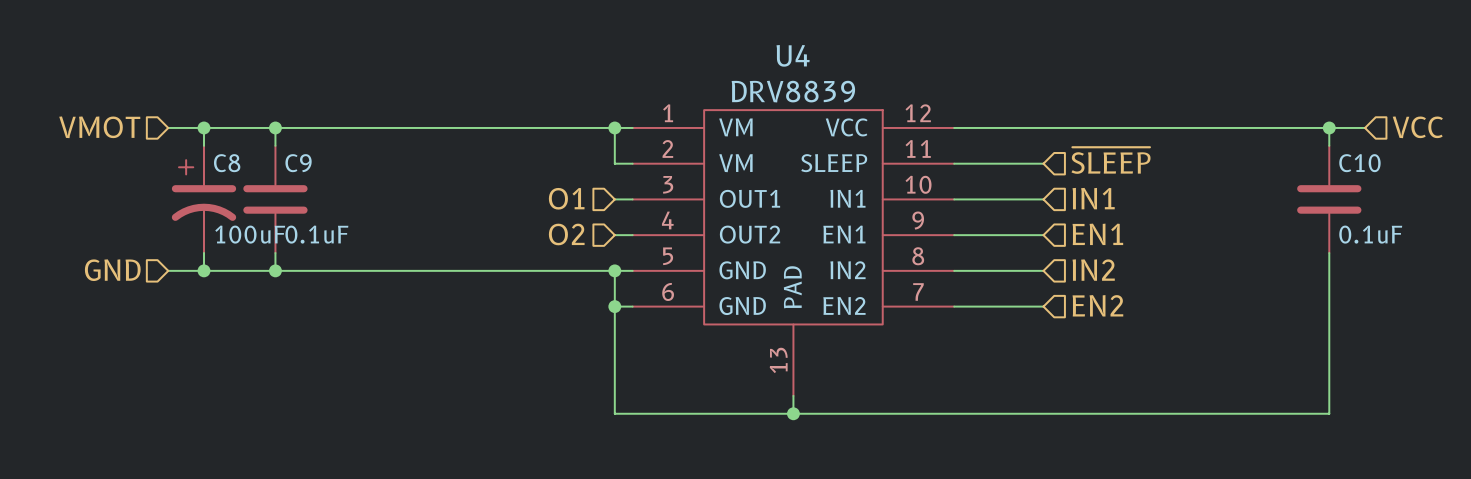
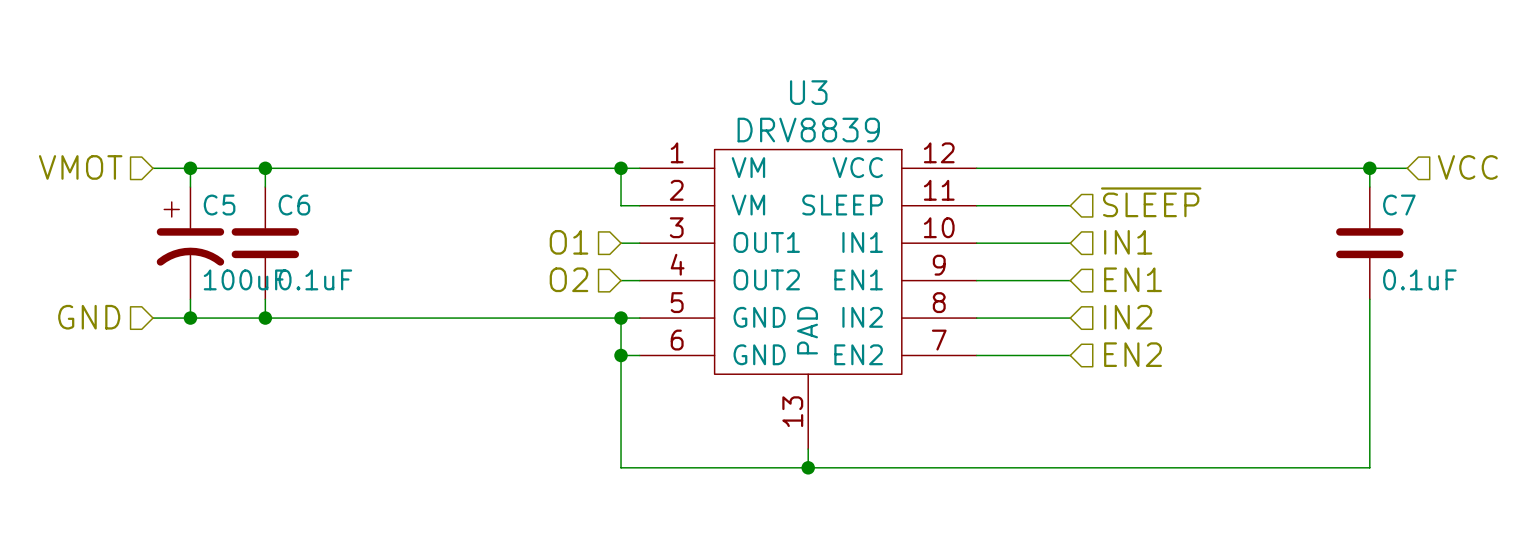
U4 name: U4 (793, 55) -> U3 (808, 92)
C8 name: C8 (227, 163) -> C5 (219, 205)
C9 name: C9 (298, 163) -> C6 (294, 205)
C10 name: C10 (1359, 163) -> C7 (1399, 205)

